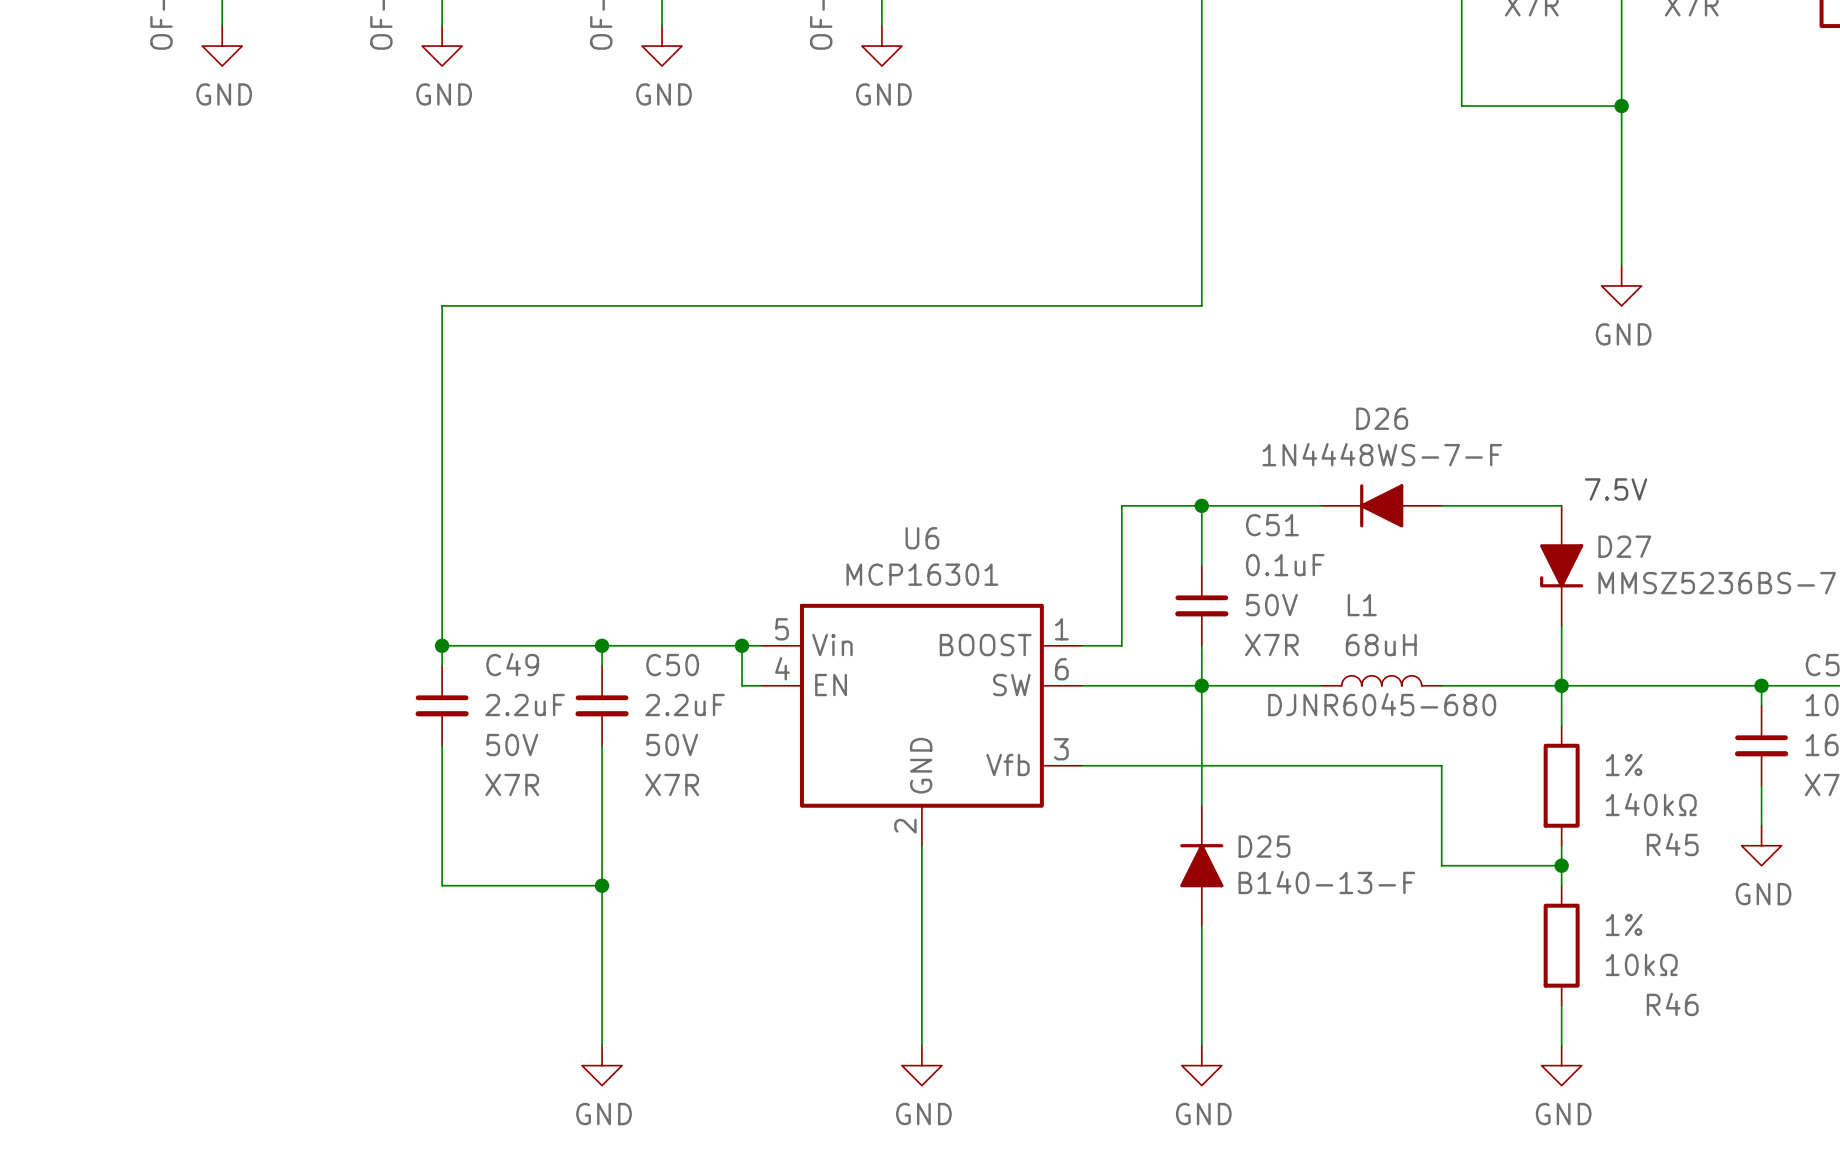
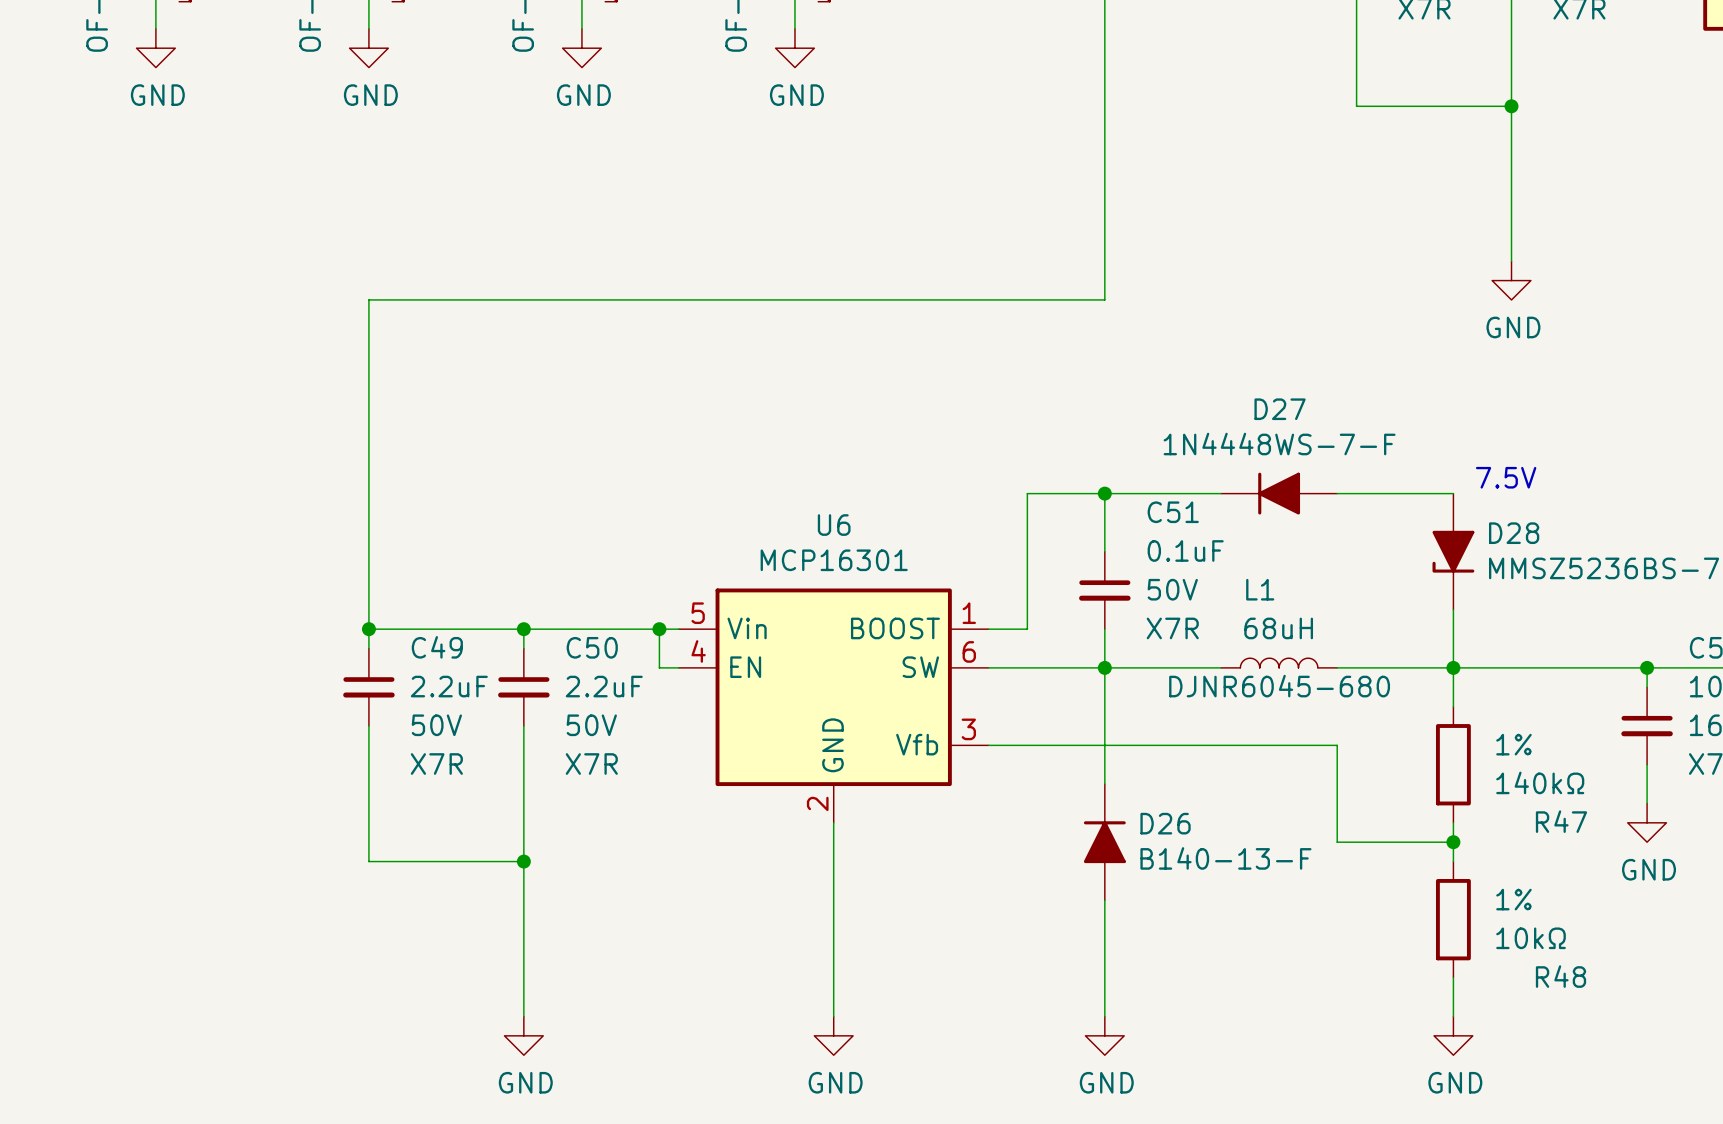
D26 name: D26 (1382, 418) -> D27 (1280, 409)
D27 name: D27 (1624, 546) -> D28 (1514, 533)
R45 name: R45 (1672, 844) -> R47 (1561, 821)
D25 name: D25 (1264, 846) -> D26 (1165, 823)
R46 name: R46 (1672, 1004) -> R48 (1560, 976)

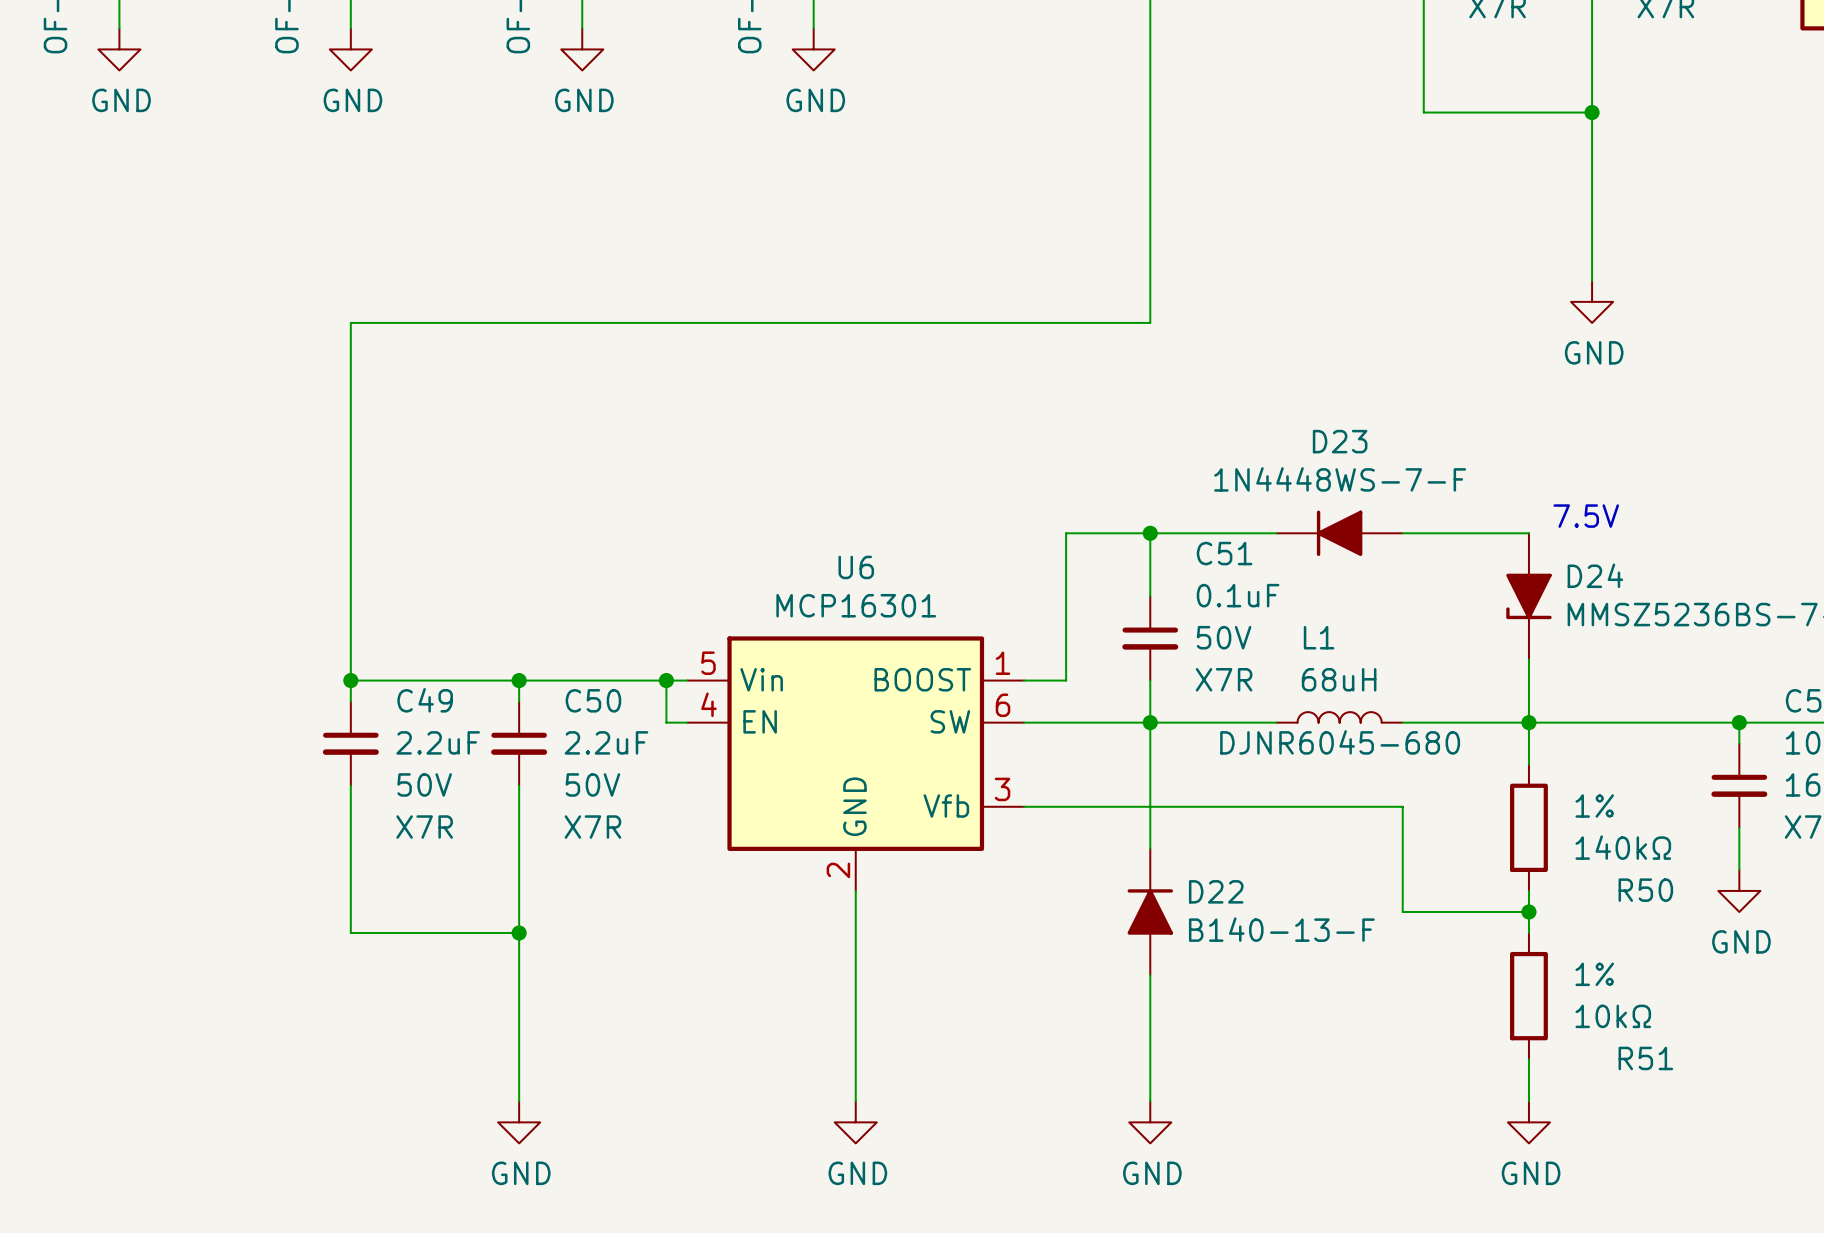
D27 name: D27 (1280, 409) -> D23 (1340, 441)
D28 name: D28 (1514, 533) -> D24 (1595, 575)
R47 name: R47 (1561, 821) -> R50 (1645, 890)
D26 name: D26 (1165, 823) -> D22 (1216, 891)
R48 name: R48 (1560, 976) -> R51 (1645, 1058)

